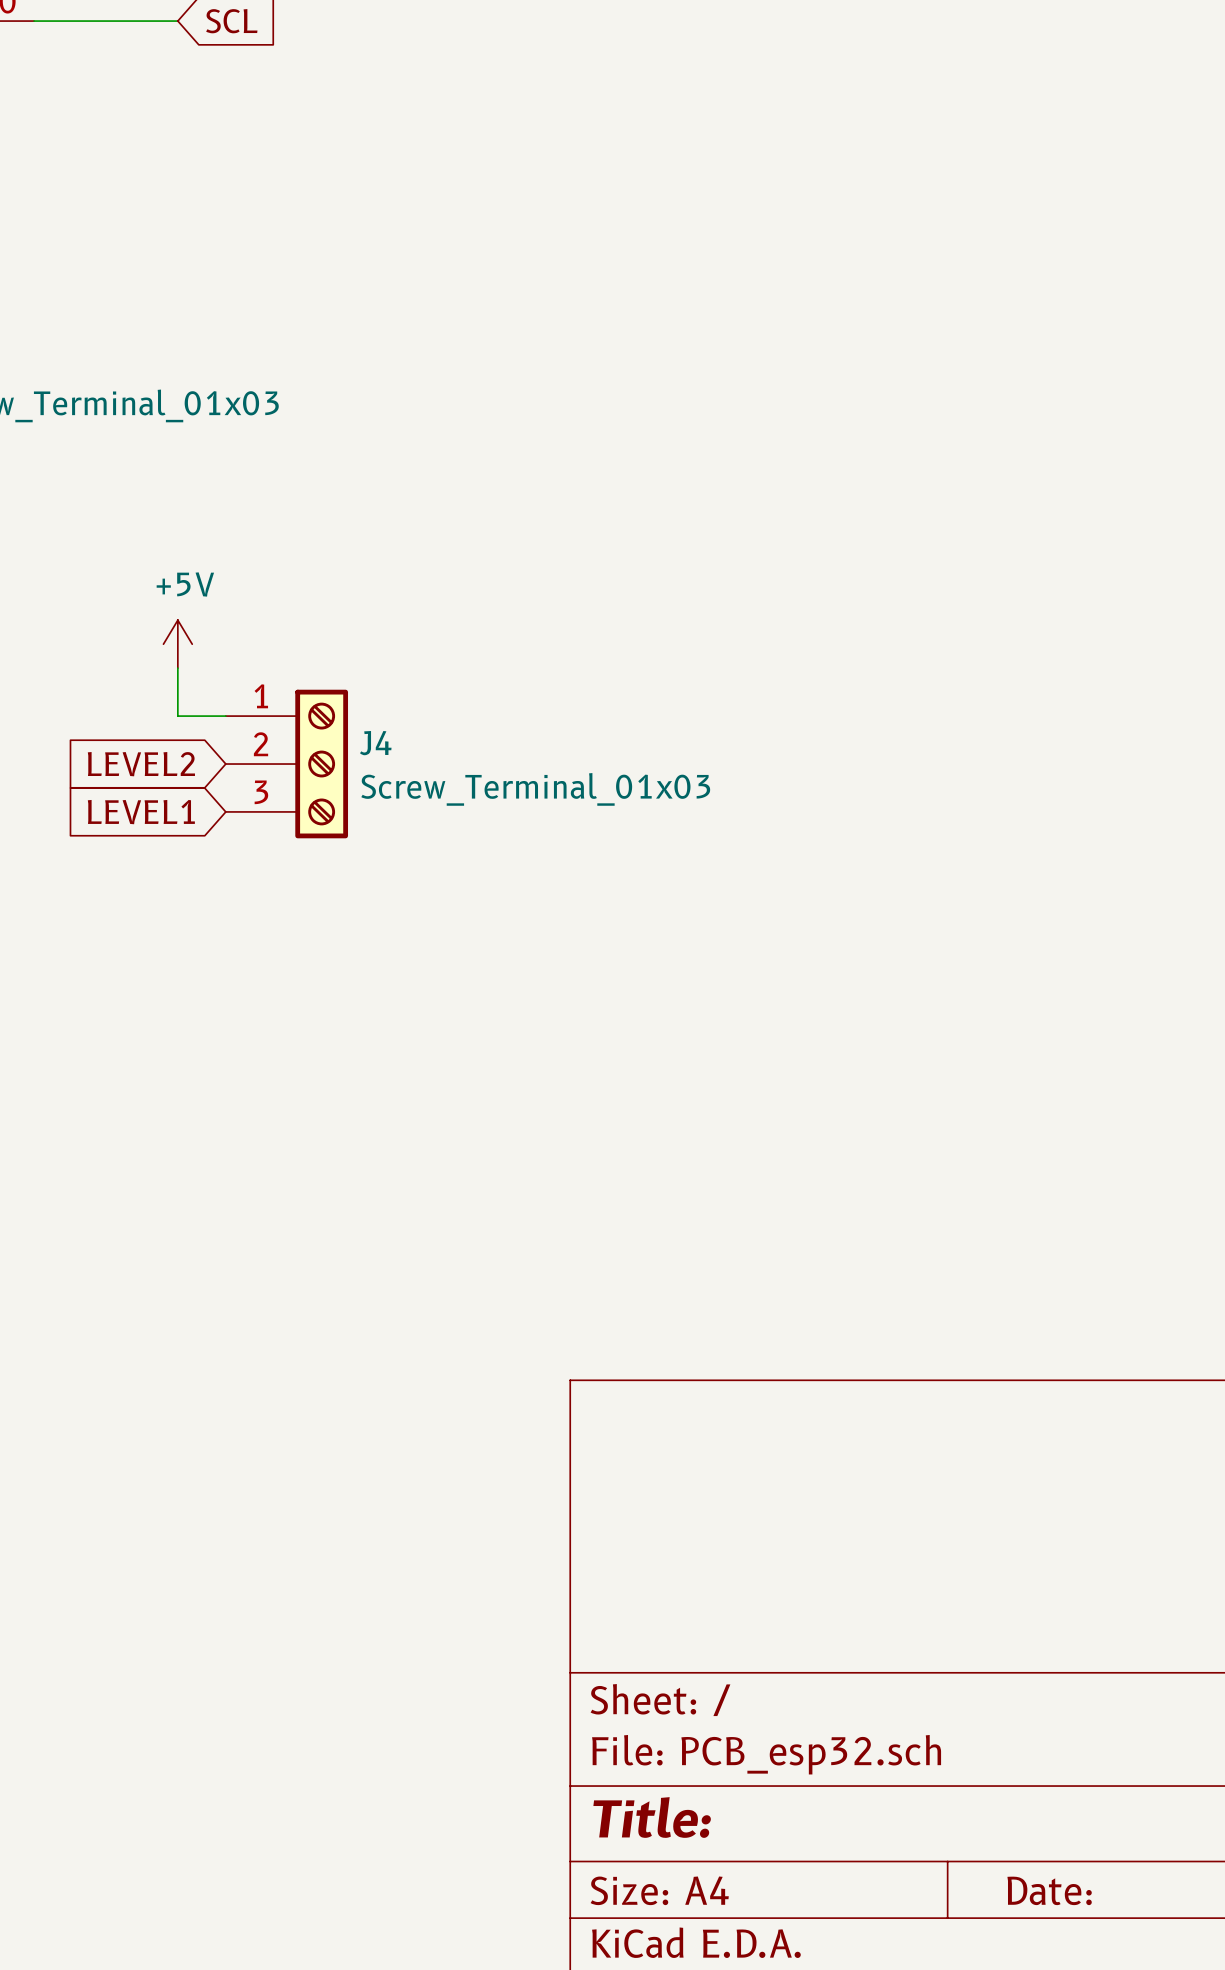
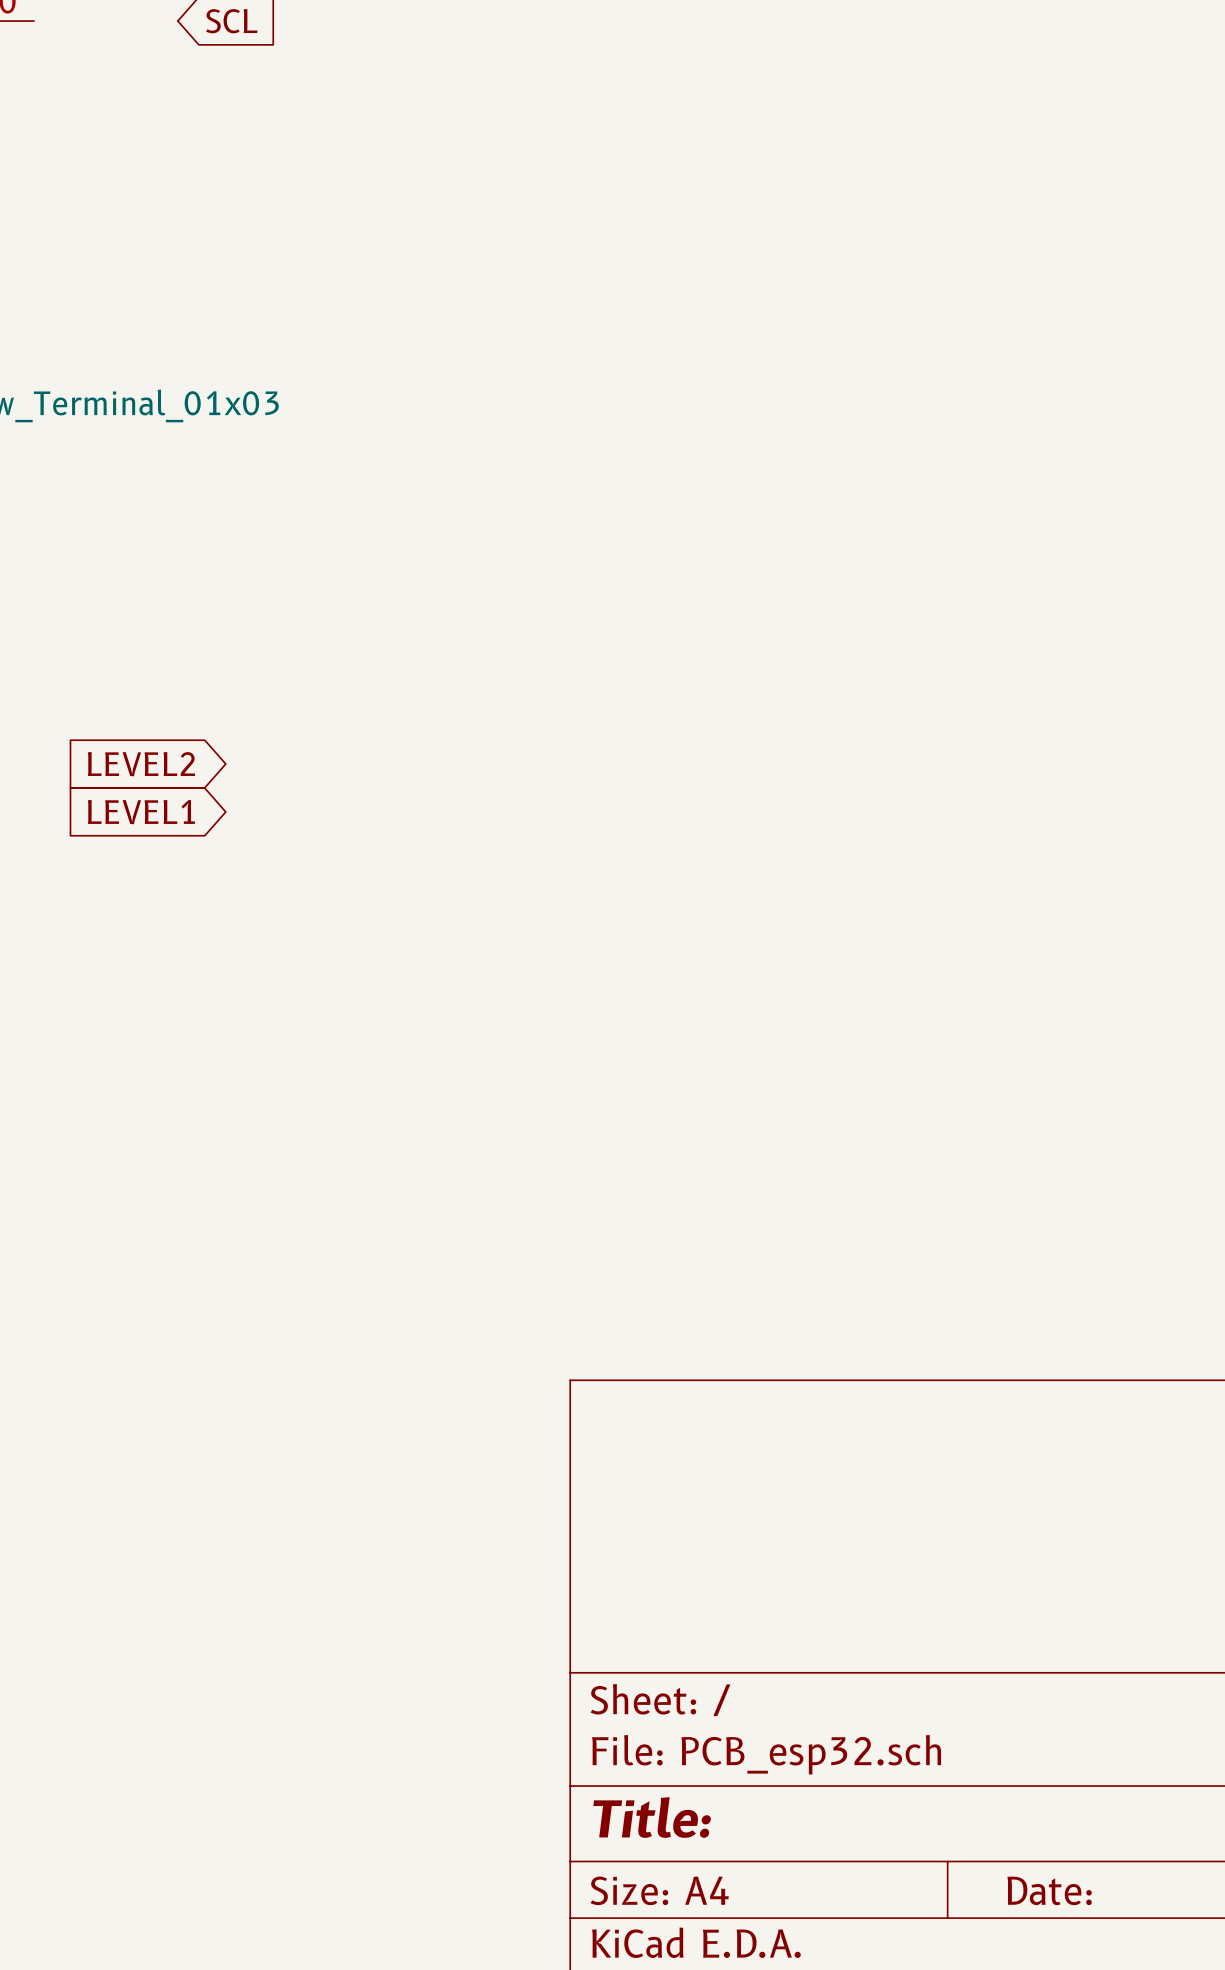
wire: (34, 21) (177, 21) -> none
power symbol: +5V (177, 644) -> none
wire: (177, 668) (177, 716) (225, 716) -> none
J4: Screw_Terminal_01x03 (286, 764) -> none

